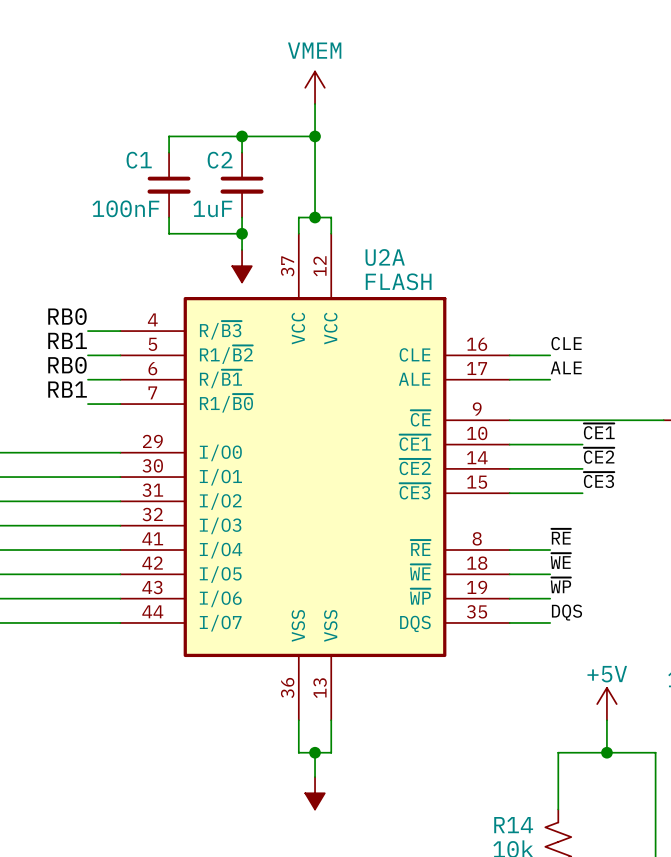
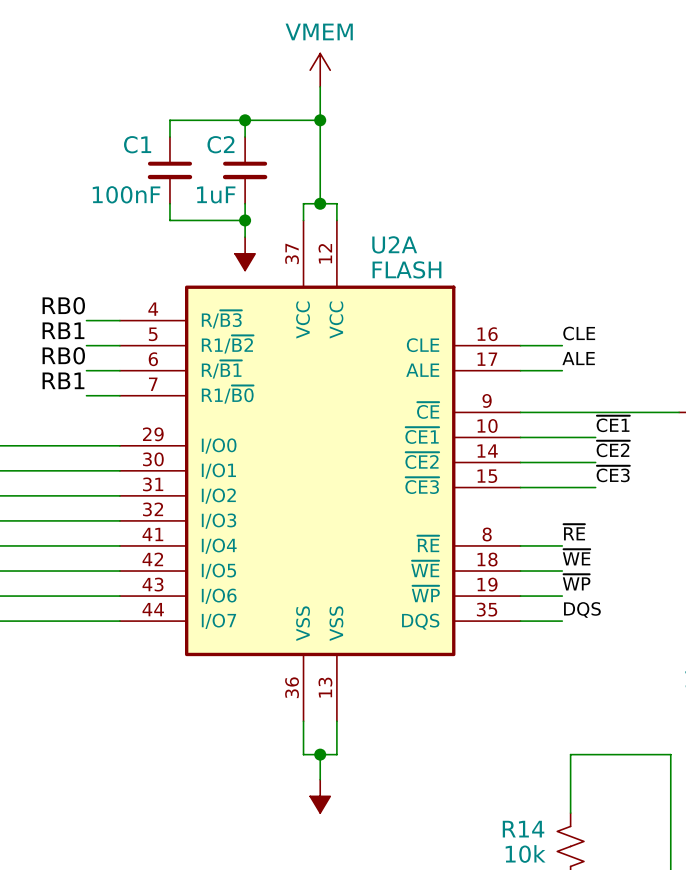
power symbol: +5V (606, 704) -> none
wire: (606, 720) (606, 752) -> none
junction: (606, 752) -> none

